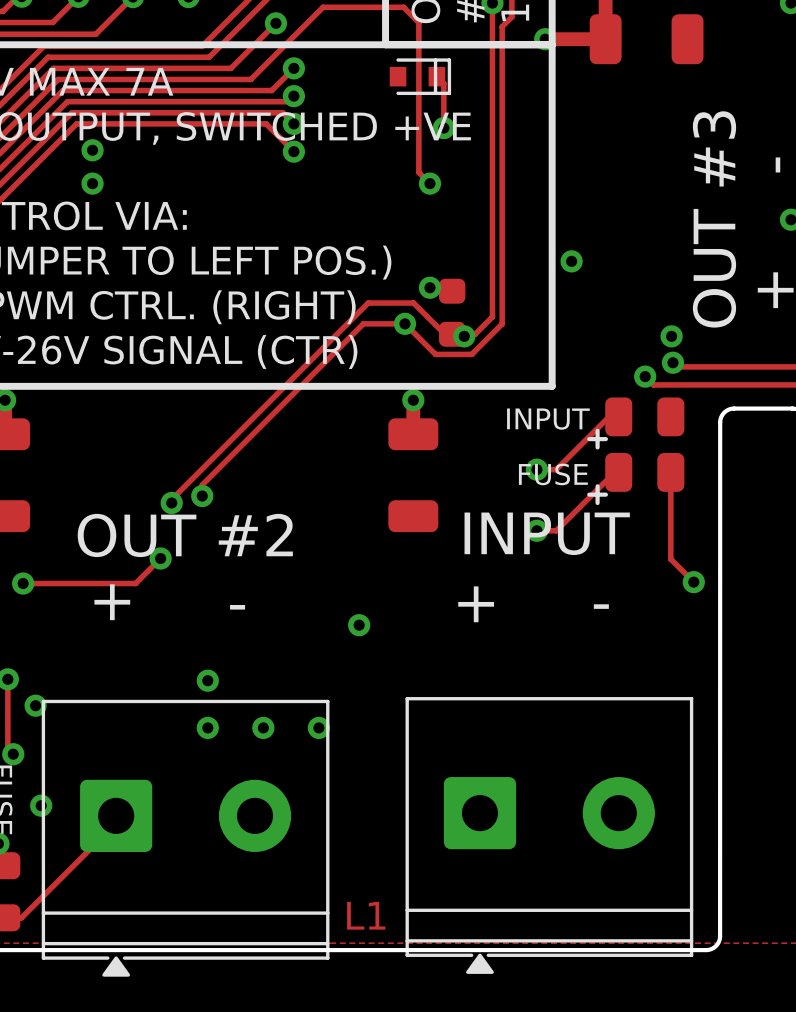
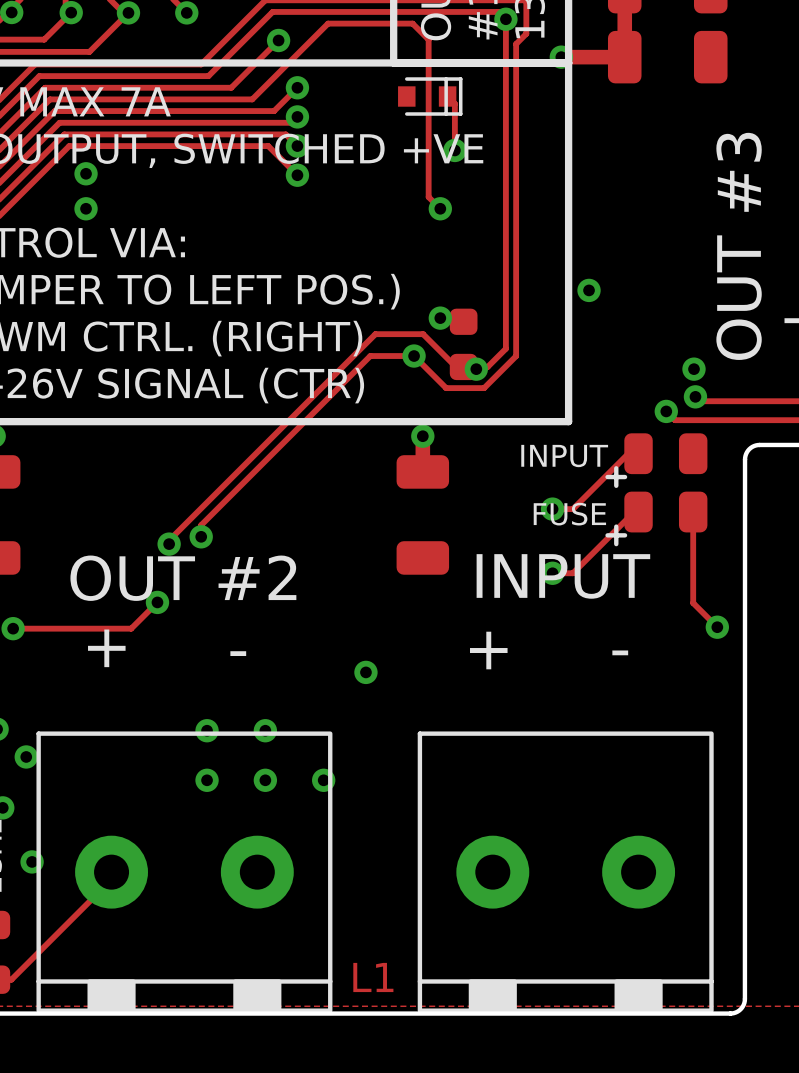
via: none -> (265, 730)
part footprint: [405, 697, 694, 974] -> [417, 731, 714, 1013]
part footprint: [41, 699, 330, 977] -> [36, 731, 333, 1013]

